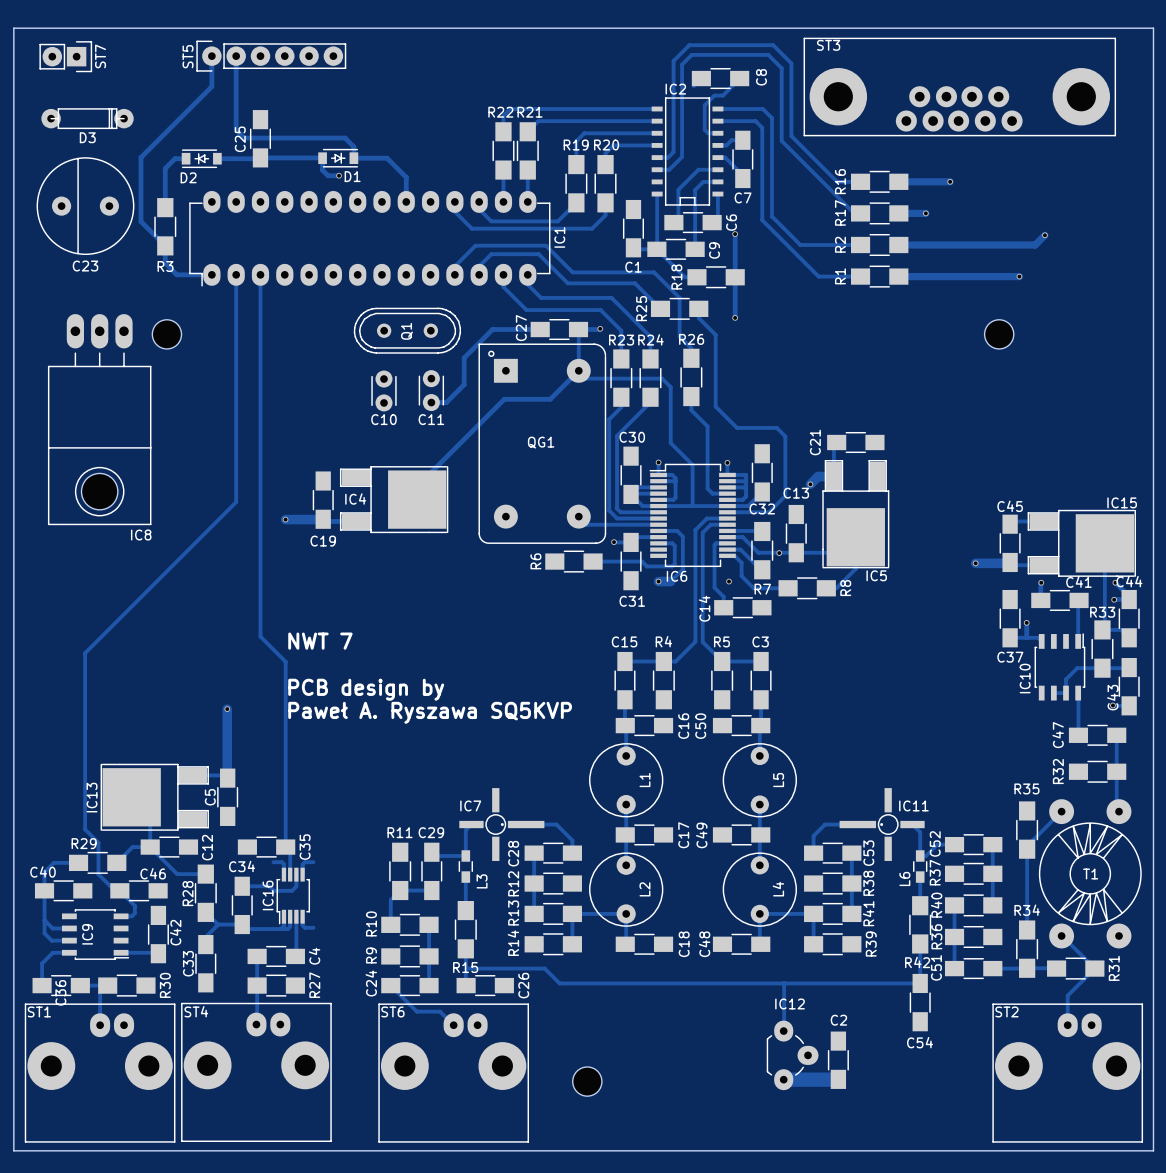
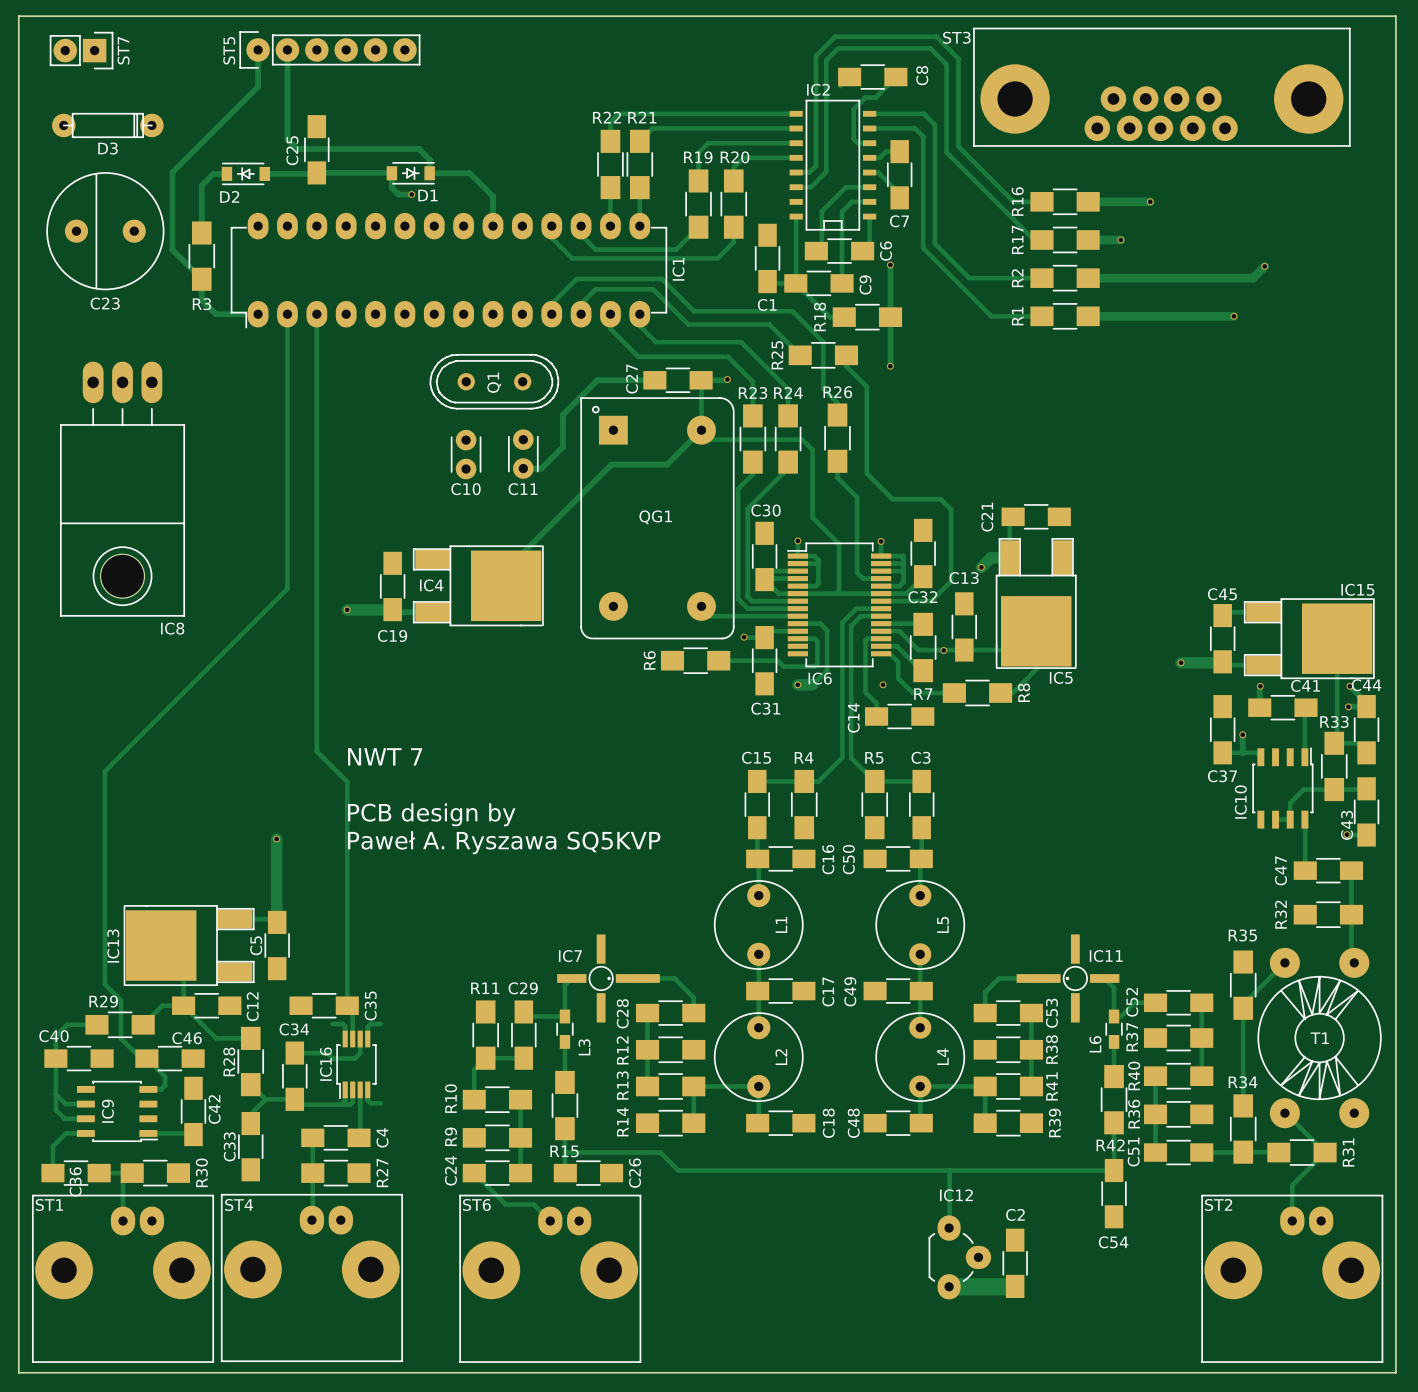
ST3 name position: ST3 (828, 45) -> ST3 (956, 37)
part: (166, 334) -> none
part: (999, 334) -> none
part: (587, 1081) -> none

